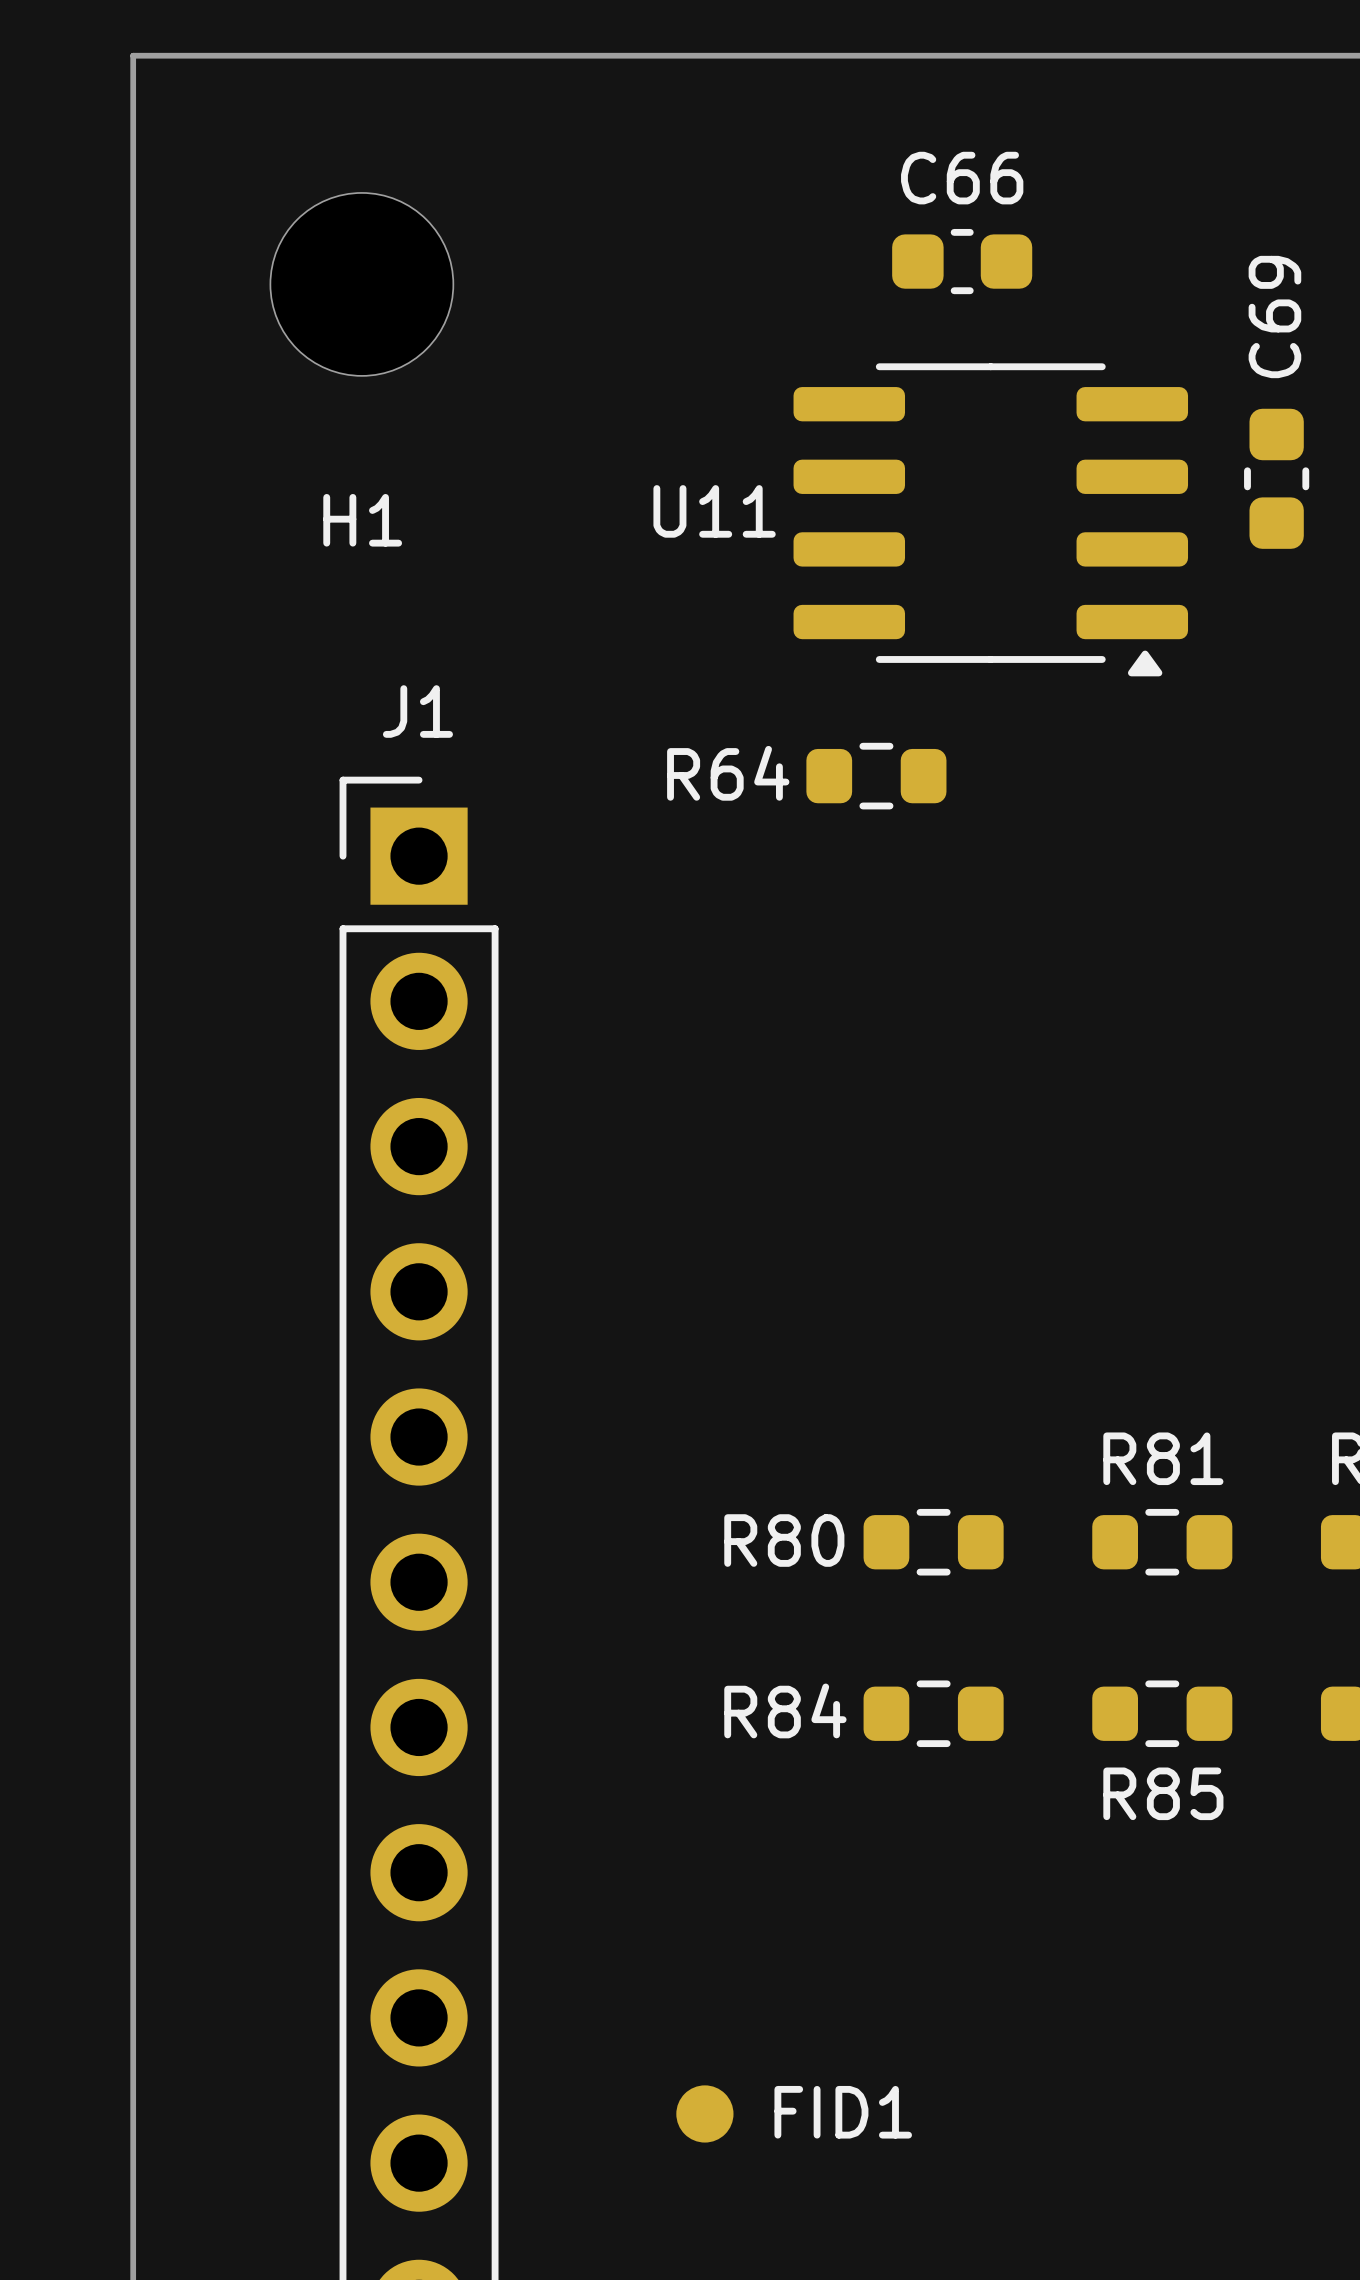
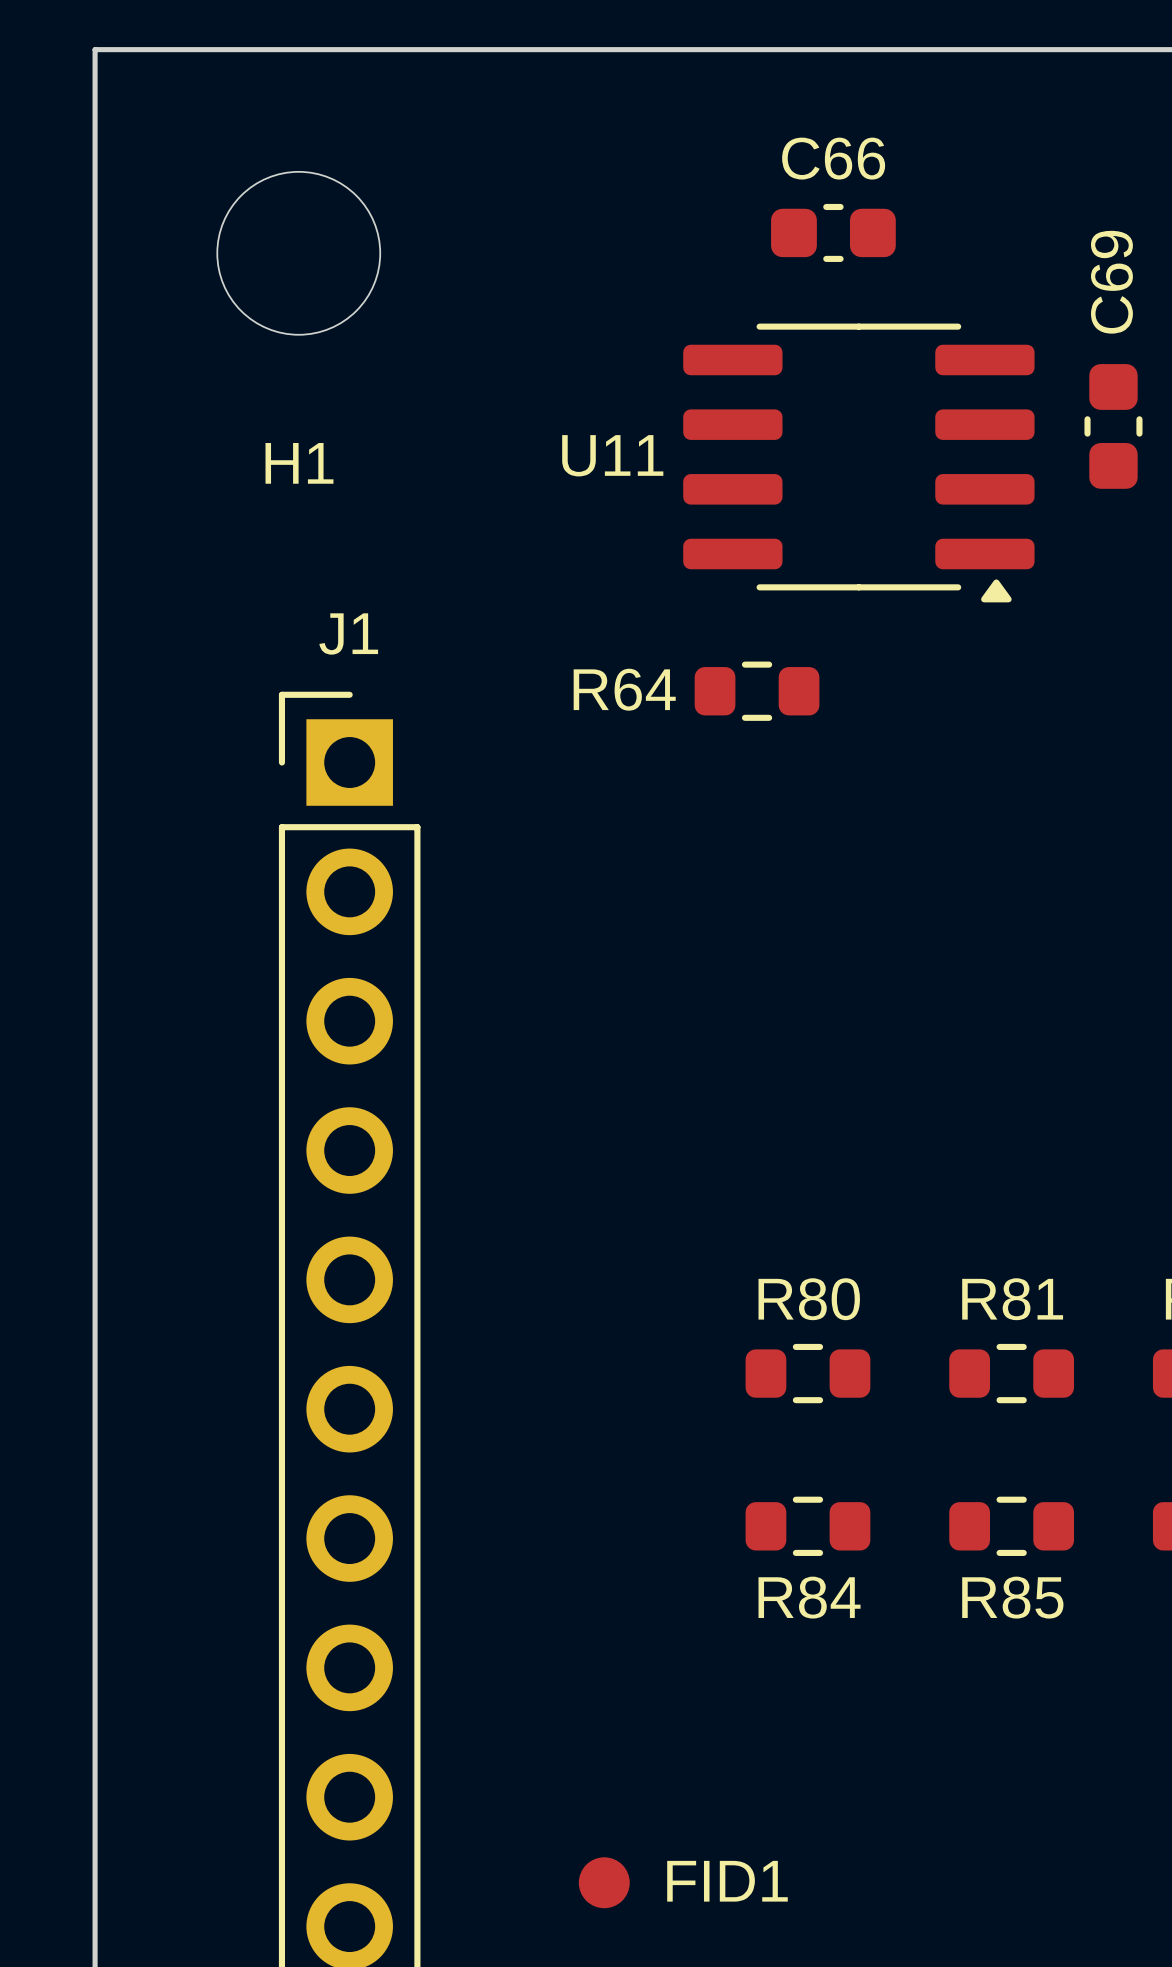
R80 name position: R80 (784, 1540) -> R80 (809, 1299)
R84 name position: R84 (785, 1710) -> R84 (809, 1597)

